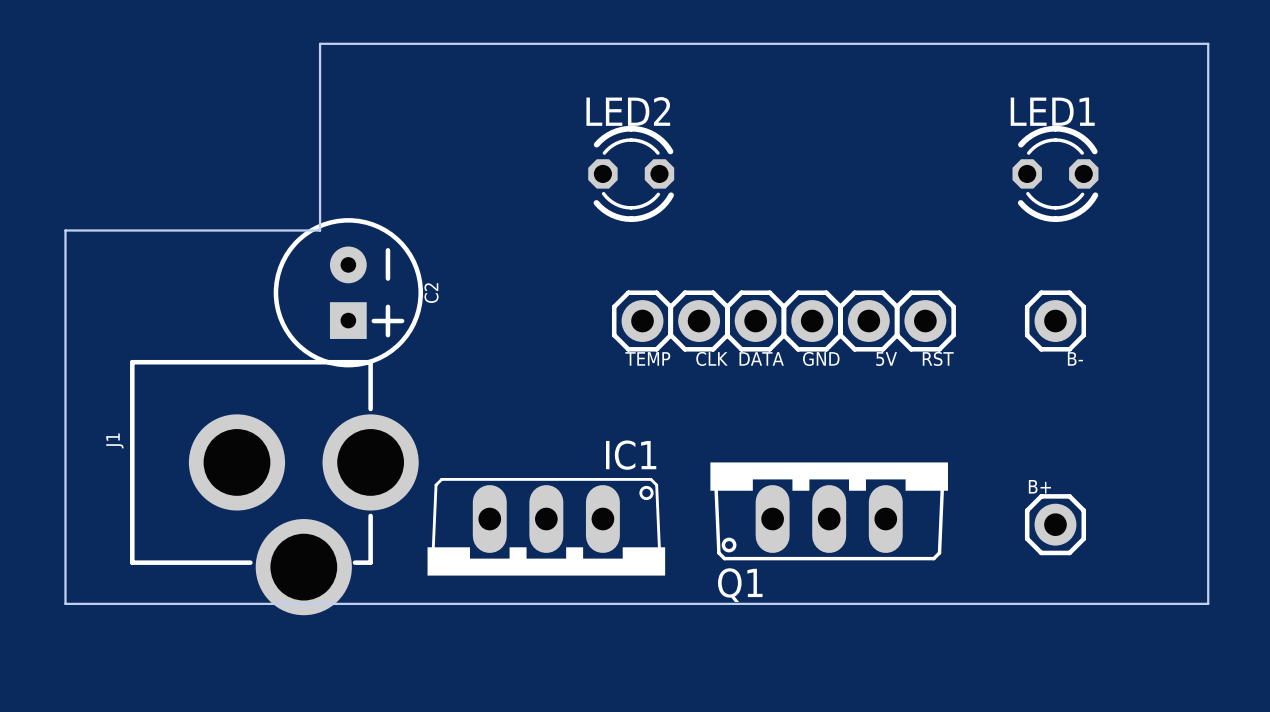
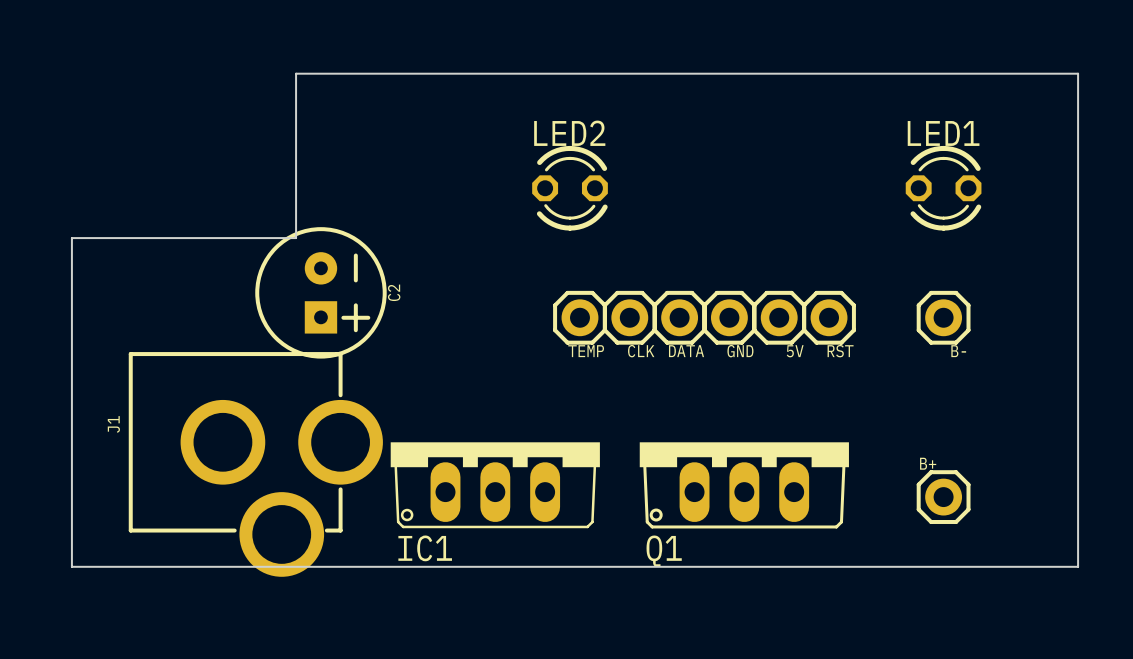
IC1 rotation: 0° (546, 526) -> 180° (495, 485)

